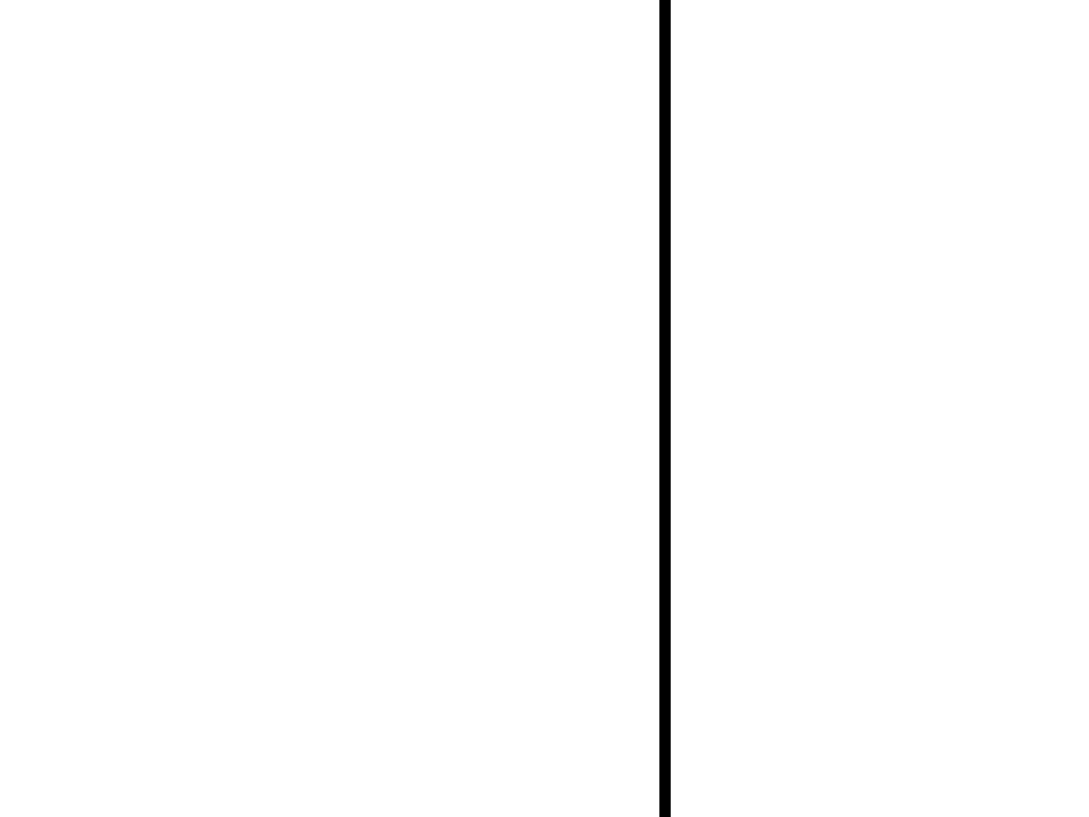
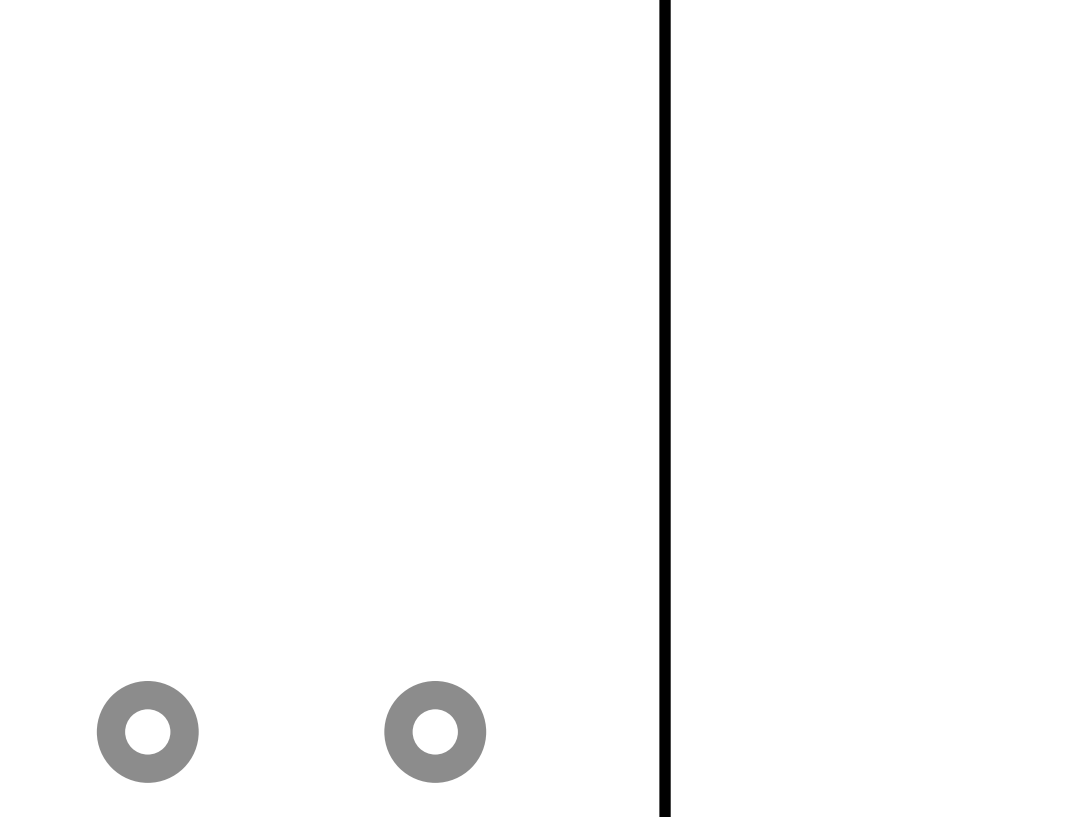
via: none -> (147, 731)
via: none -> (435, 731)

